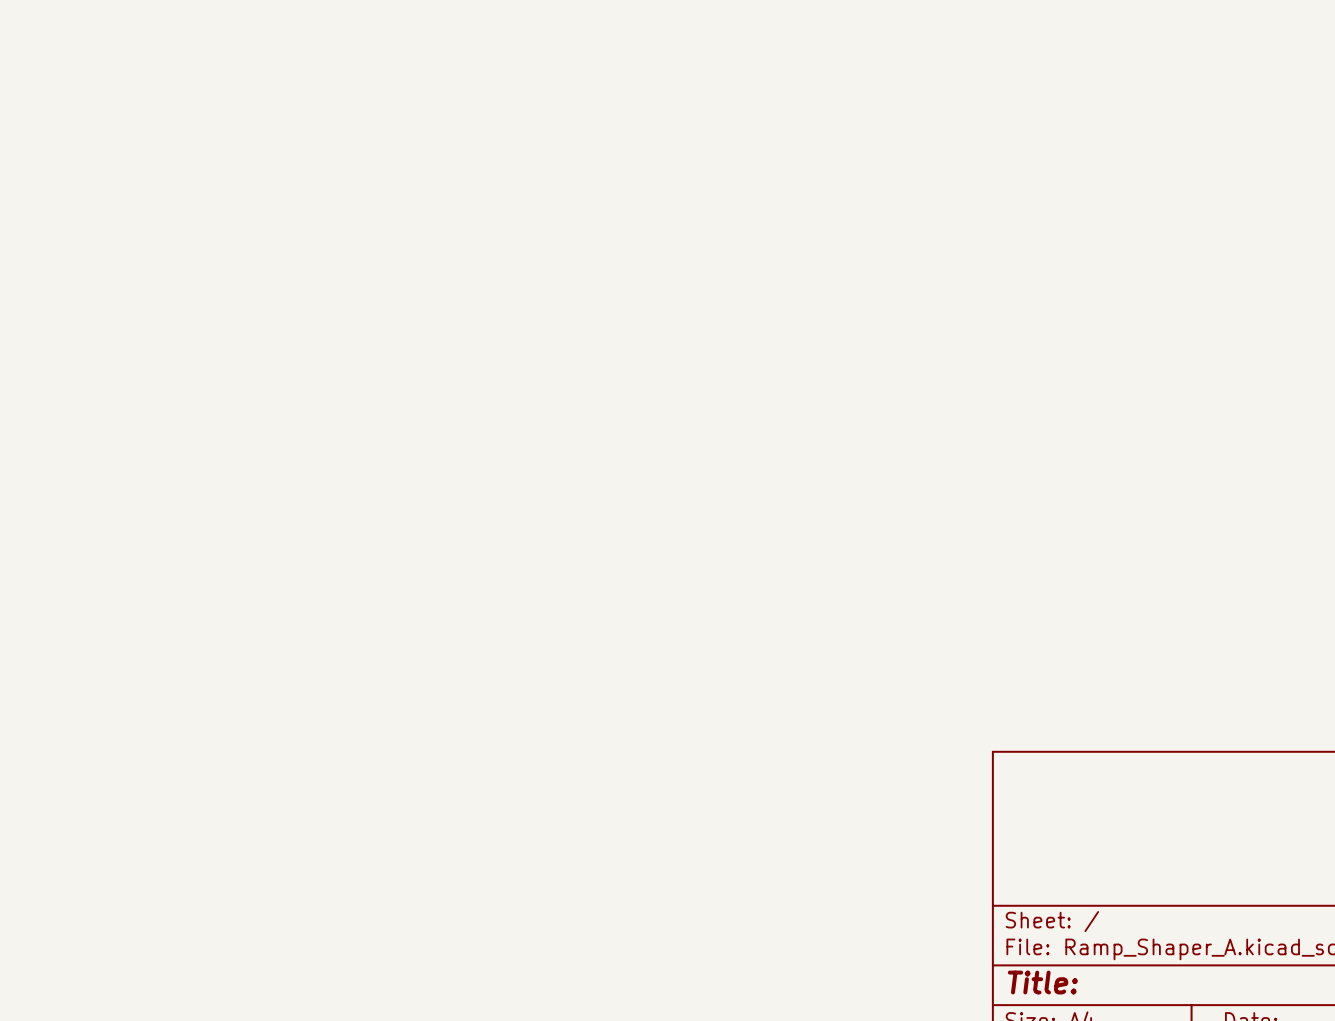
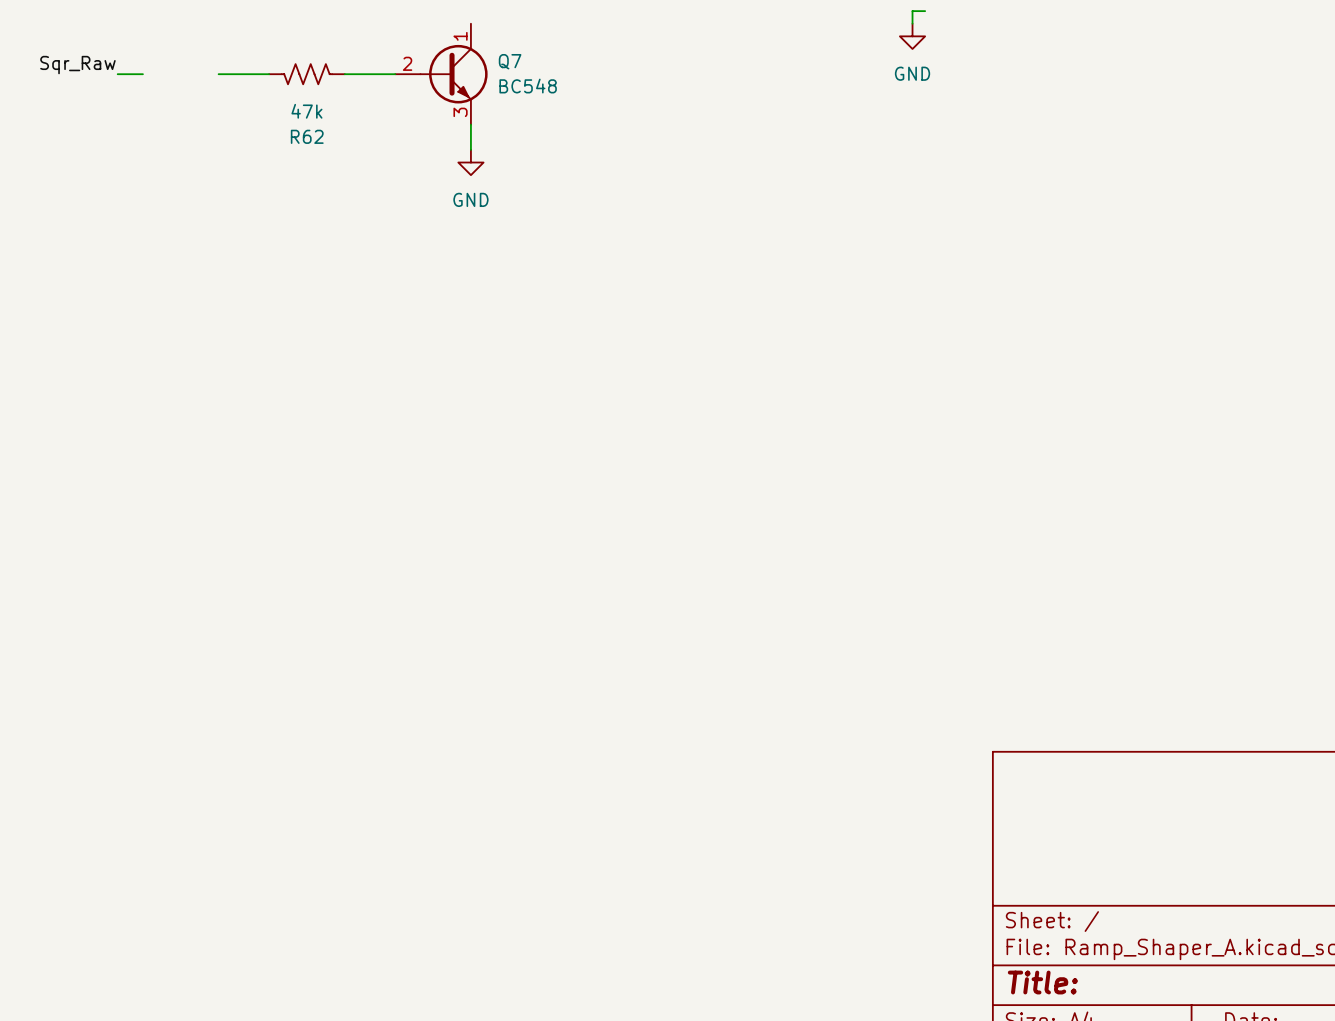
wire: none -> (925, 11) (912, 11) (912, 23)
power symbol: none -> GND (912, 36)
label: none -> Sqr_Raw (77, 65)
wire: none -> (117, 74) (142, 74)
wire: none -> (218, 74) (269, 74)
R62: none -> 47k (306, 74)
wire: none -> (344, 74) (395, 74)
Q7: none -> BC548 (441, 74)
wire: none -> (470, 124) (470, 149)
power symbol: none -> GND (470, 162)

